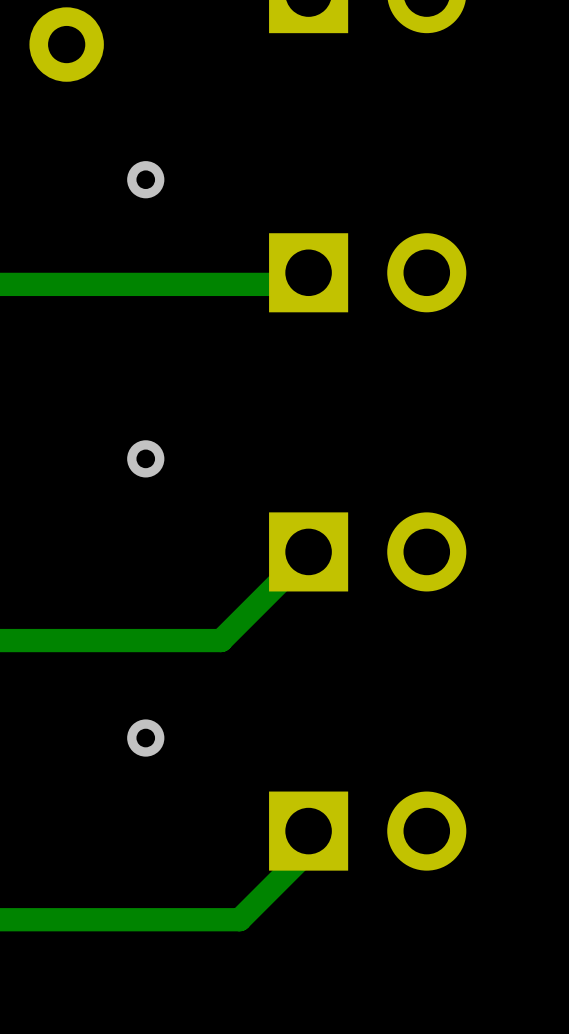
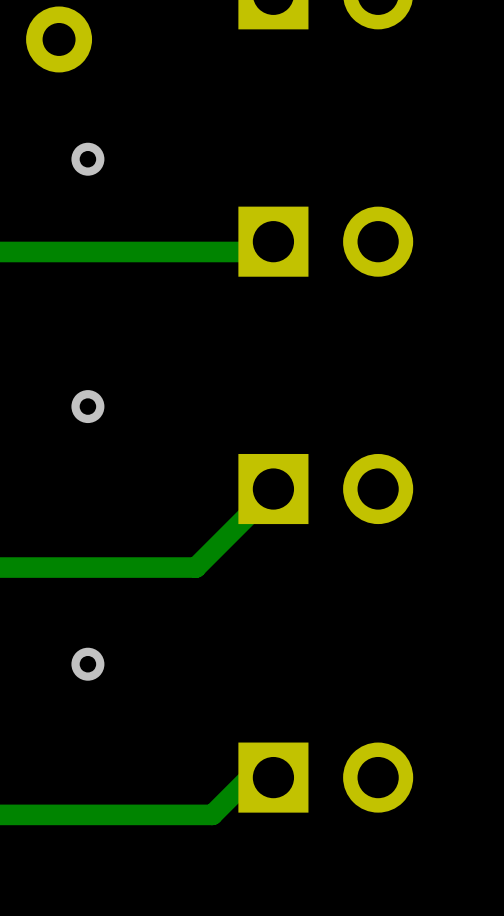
via position: (145, 179) -> (87, 159)
via position: (145, 458) -> (87, 406)
via position: (145, 738) -> (87, 664)
part position: (367, 831) -> (325, 777)

